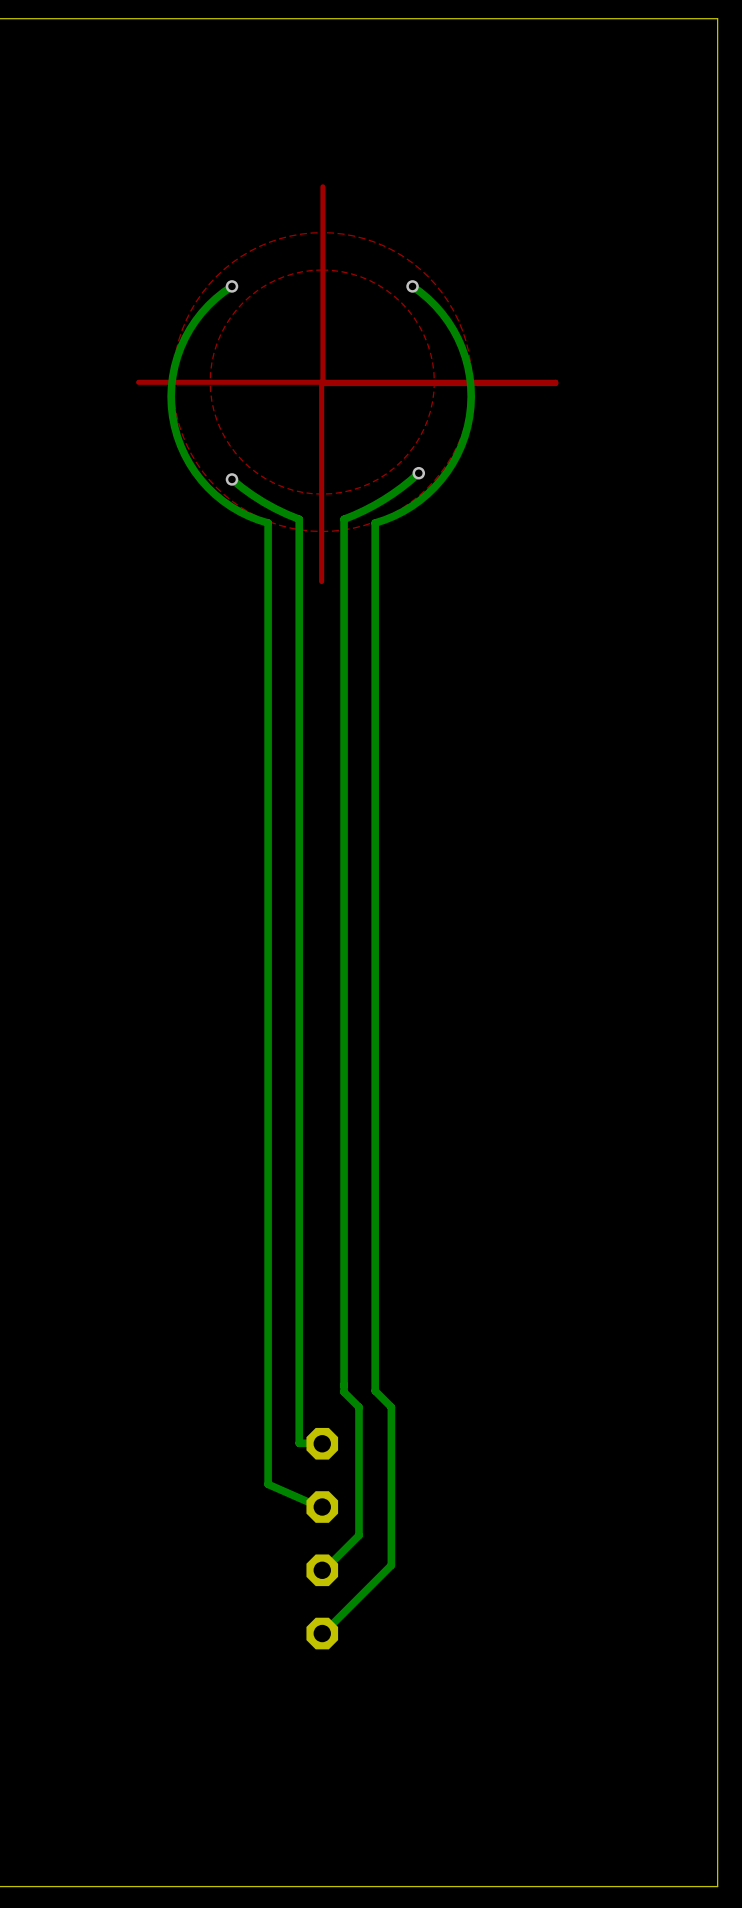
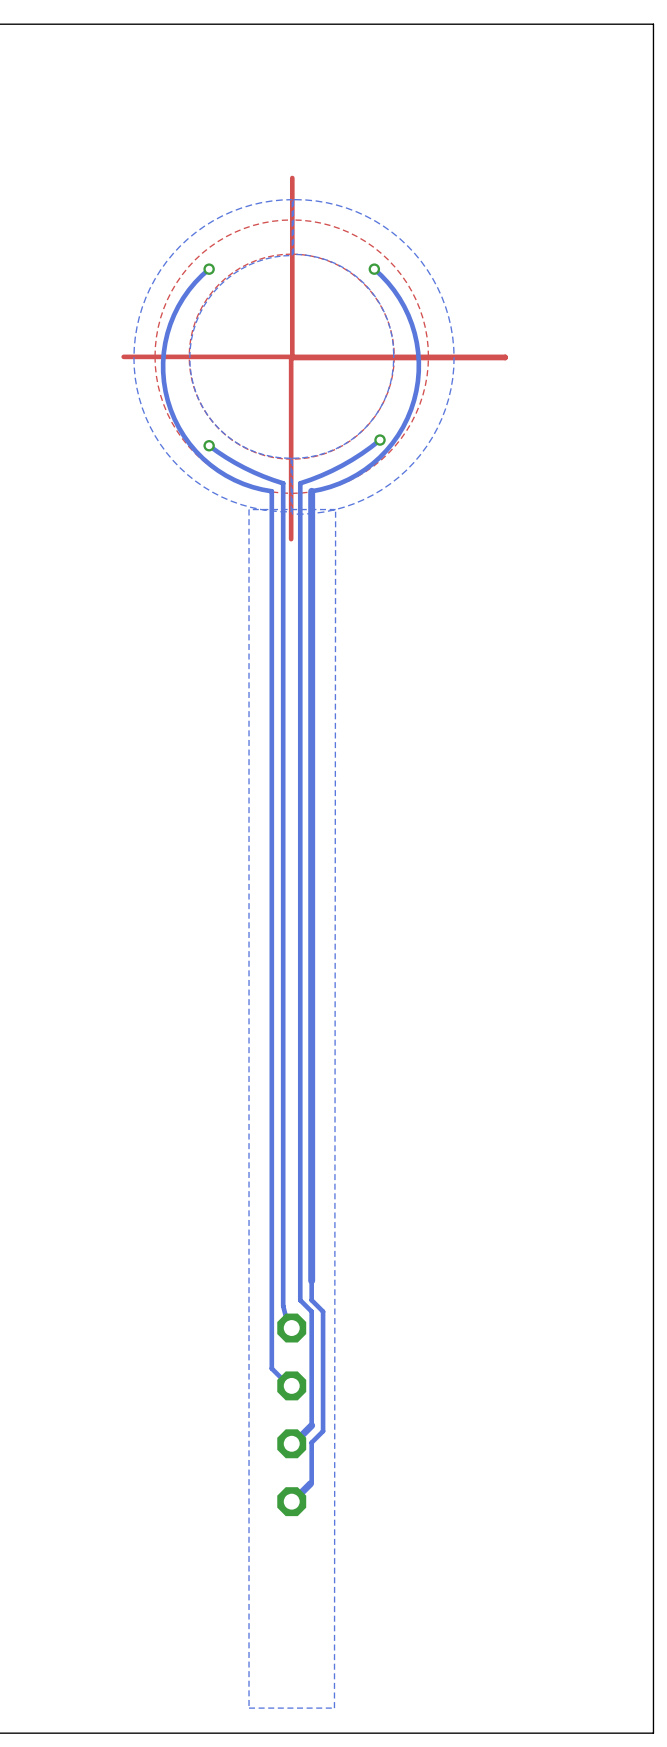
bottom zone outline: none -> (292, 199) (292, 255) (265, 258) (248, 265) (233, 274) (219, 285) (208, 299) (199, 314) (191, 340) (189, 358) (191, 375) (195, 392) (203, 408) (219, 428) (239, 444) (255, 452) (272, 456) (291, 458) (291, 511) (280, 511) (250, 507) (221, 497) (195, 481) (173, 460) (155, 435) (142, 408) (135, 378) (134, 347) (139, 317) (150, 287) (166, 261) (187, 238) (204, 226) (231, 211) (261, 202) (292, 199)
bottom zone outline: none -> (295, 199) (293, 199) (293, 254) (310, 255) (327, 260) (343, 267) (364, 283) (375, 297) (384, 312) (392, 337) (393, 354) (392, 375) (387, 392) (380, 408) (364, 428) (343, 444) (327, 452) (310, 456) (292, 458) (292, 514) (302, 514) (323, 512) (353, 503) (381, 489) (406, 470) (426, 446) (441, 419) (450, 389) (454, 358) (451, 327) (442, 297) (427, 270) (407, 246) (383, 226) (356, 211) (326, 202) (295, 199)
bottom track: (231, 286) (208, 305) (195, 320) (185, 338) (174, 366) (171, 386) (171, 406) (174, 426) (180, 445) (189, 463) (201, 480) (215, 494) (231, 506) (249, 516) (268, 523) (268, 1484) (319, 1506) -> (209, 269) (188, 290) (174, 315) (165, 342) (163, 371) (165, 391) (174, 418) (183, 435) (195, 451) (210, 464) (234, 480) (252, 487) (271, 491) (271, 1368) (288, 1385)
bottom track: (412, 286) (435, 305) (447, 321) (458, 338) (465, 357) (469, 376) (470, 406) (467, 426) (461, 445) (452, 463) (441, 479) (427, 494) (411, 506) (393, 516) (375, 523) (375, 1390) (391, 1407) (391, 1565) (344, 1612) -> none
bottom track: (418, 473) (383, 499) (344, 519) (344, 529) -> (374, 269) (394, 290) (411, 324) (418, 362) (414, 400) (403, 427) (379, 457) (348, 479) (311, 491)
bottom track: none -> (380, 440) (342, 465) (300, 483) (300, 1300) (311, 1311) (311, 1425)
bottom track: (231, 479) (263, 502) (299, 519) (299, 1443) (321, 1443) -> (209, 445) (244, 467) (283, 483) (283, 1305) (288, 1328)
bottom zone outline: none -> (335, 509) (249, 509) (249, 1708) (334, 1708) (335, 509)
bottom track: (344, 1392) (359, 1407) (359, 1535) (344, 1550) -> (311, 1280) (311, 1300) (323, 1311) (323, 1431) (311, 1442) (311, 1482)

